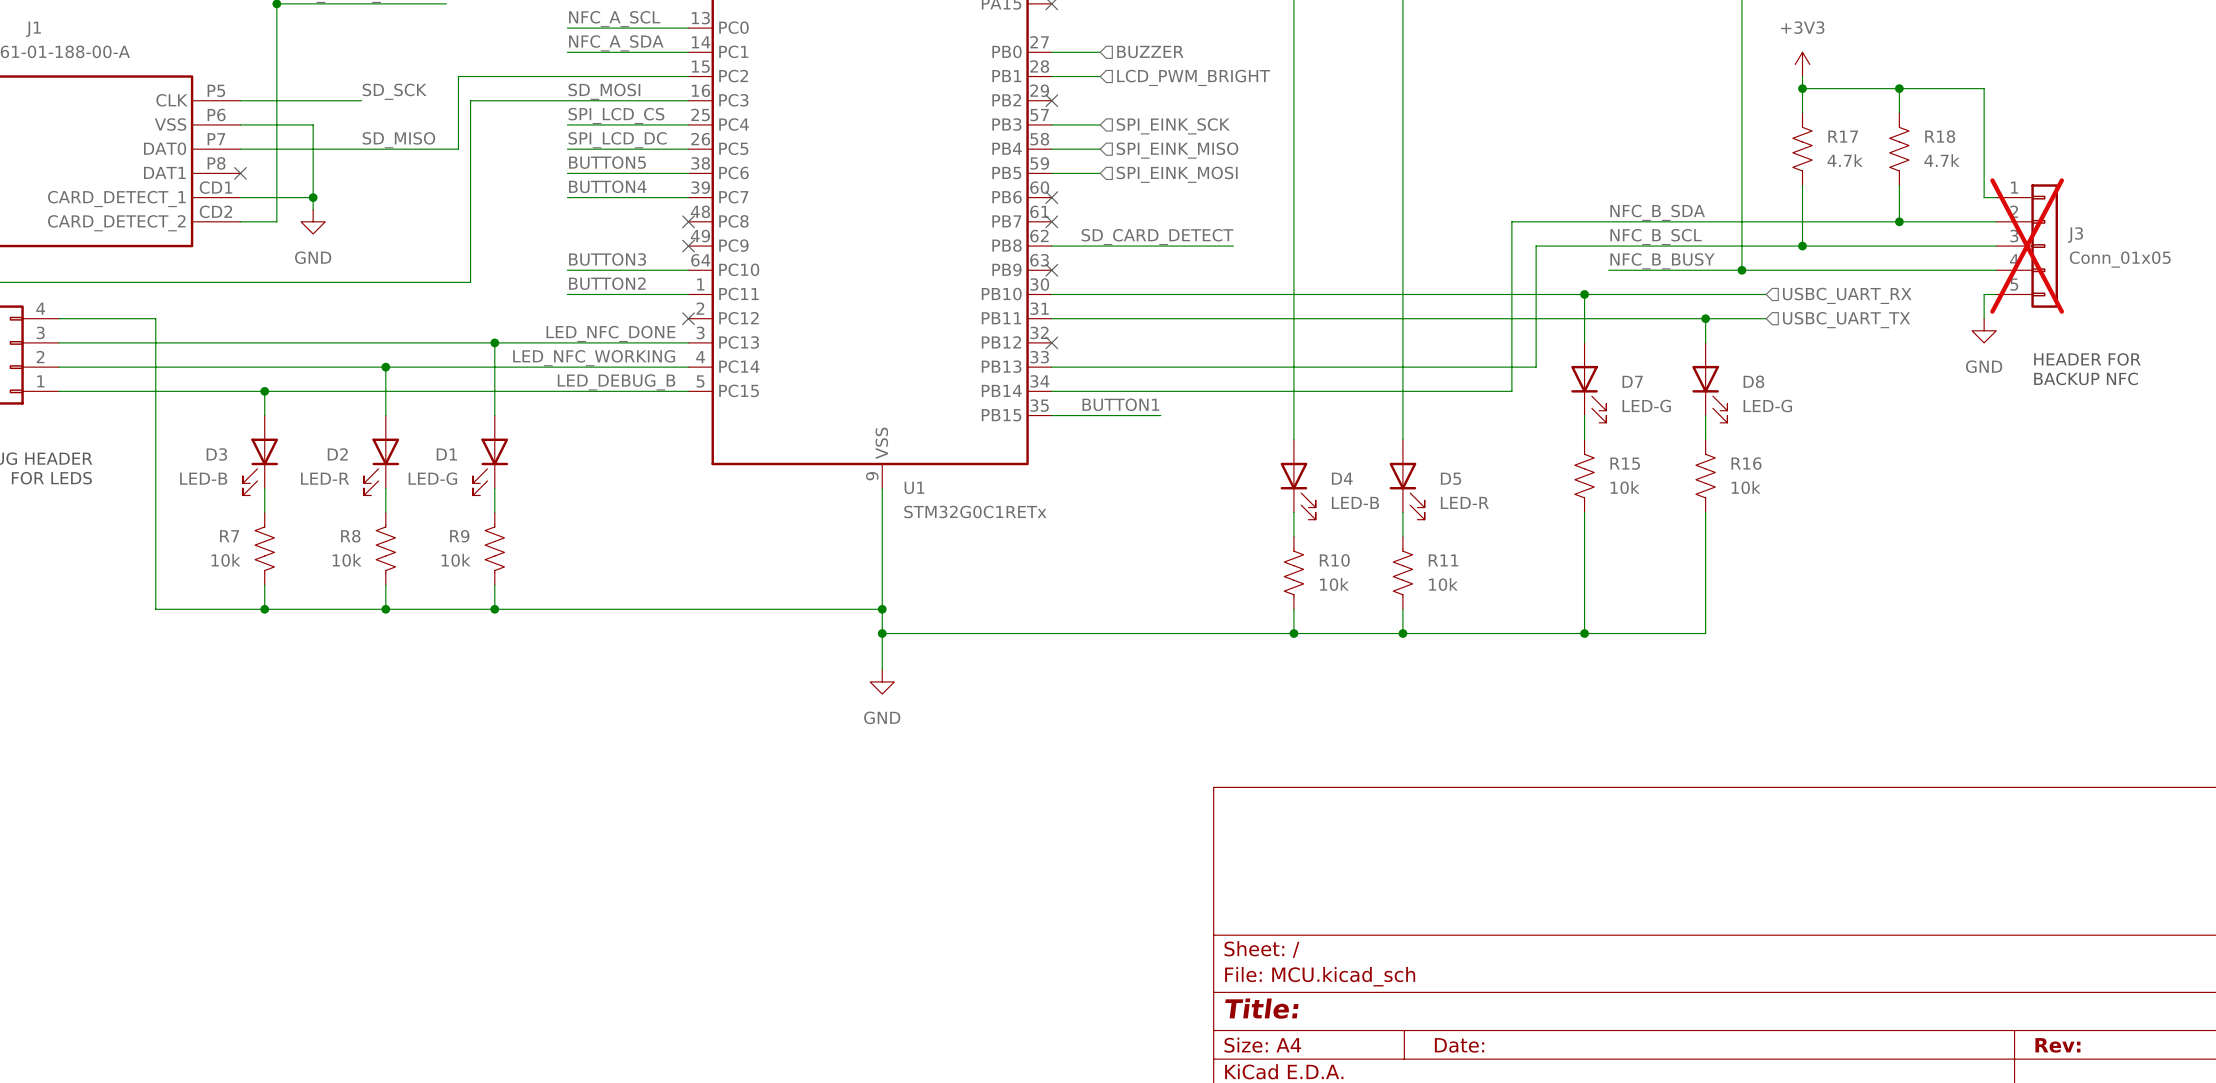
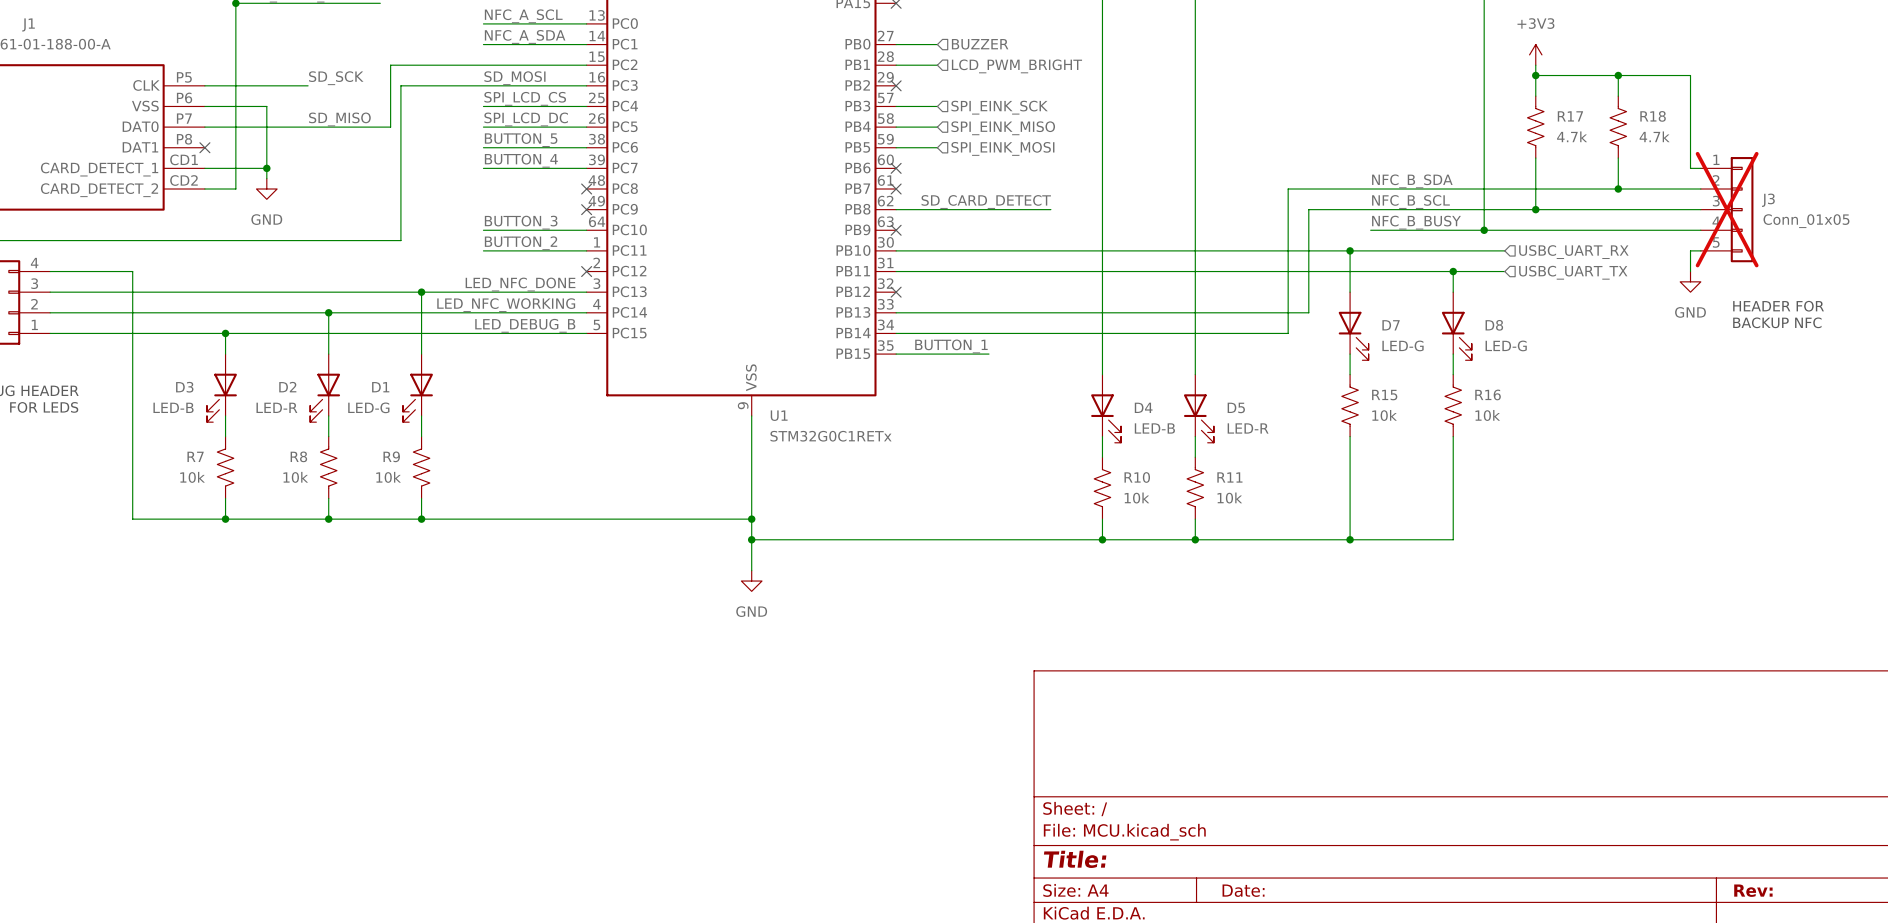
label: BUTTON5 (607, 162) -> BUTTON_5 (521, 140)
label: BUTTON4 (607, 186) -> BUTTON_4 (521, 160)
label: BUTTON3 (607, 259) -> BUTTON_3 (521, 222)
label: BUTTON2 (607, 283) -> BUTTON_2 (521, 243)
label: BUTTON1 (1120, 404) -> BUTTON_1 (951, 346)

